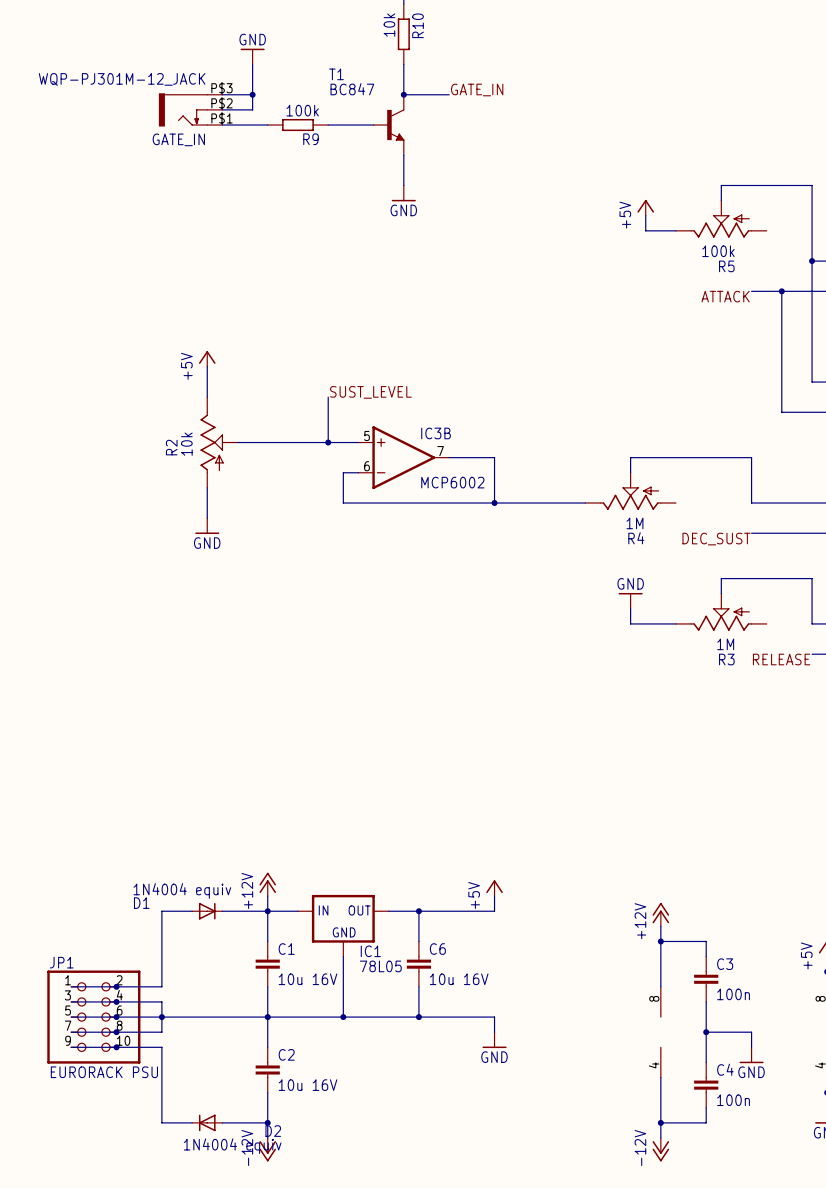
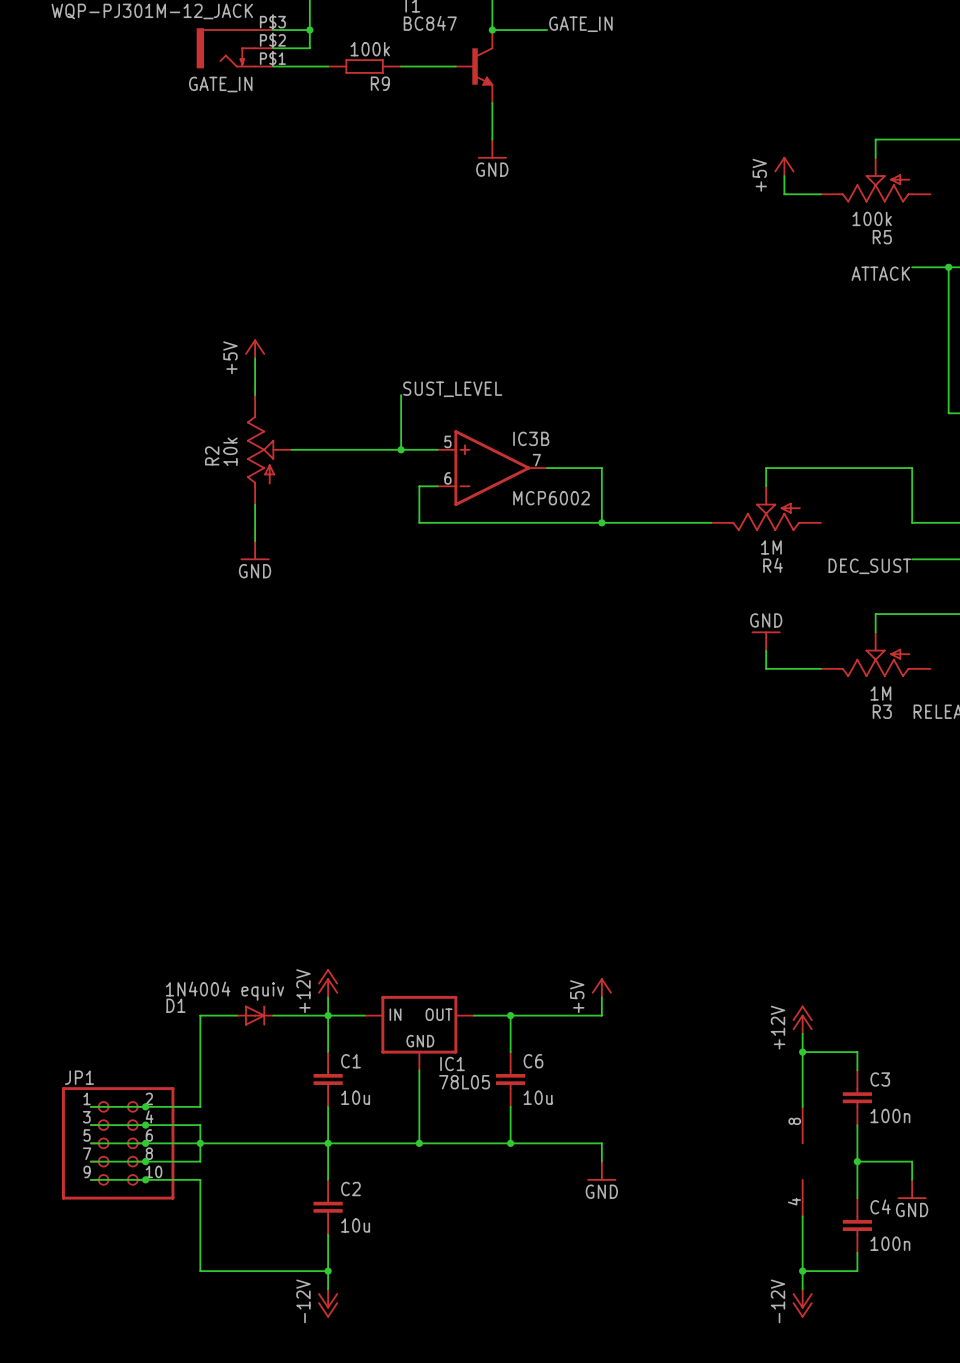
C1 value: 10u 16V (307, 979) -> 10u (355, 1097)
C6 value: 10u 16V (459, 979) -> 10u (538, 1097)
JP1 value: EURORACK PSU (104, 1072) -> none
C2 value: 10u 16V (307, 1085) -> 10u (355, 1225)
D2: 1N4004 equiv (207, 1122) -> none

